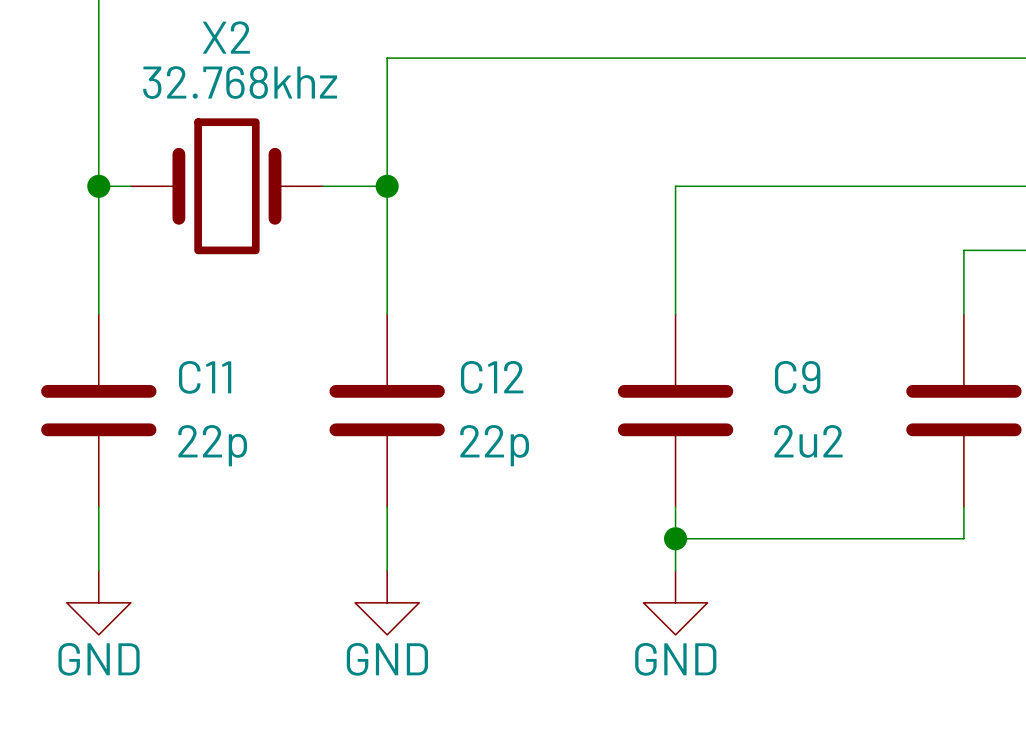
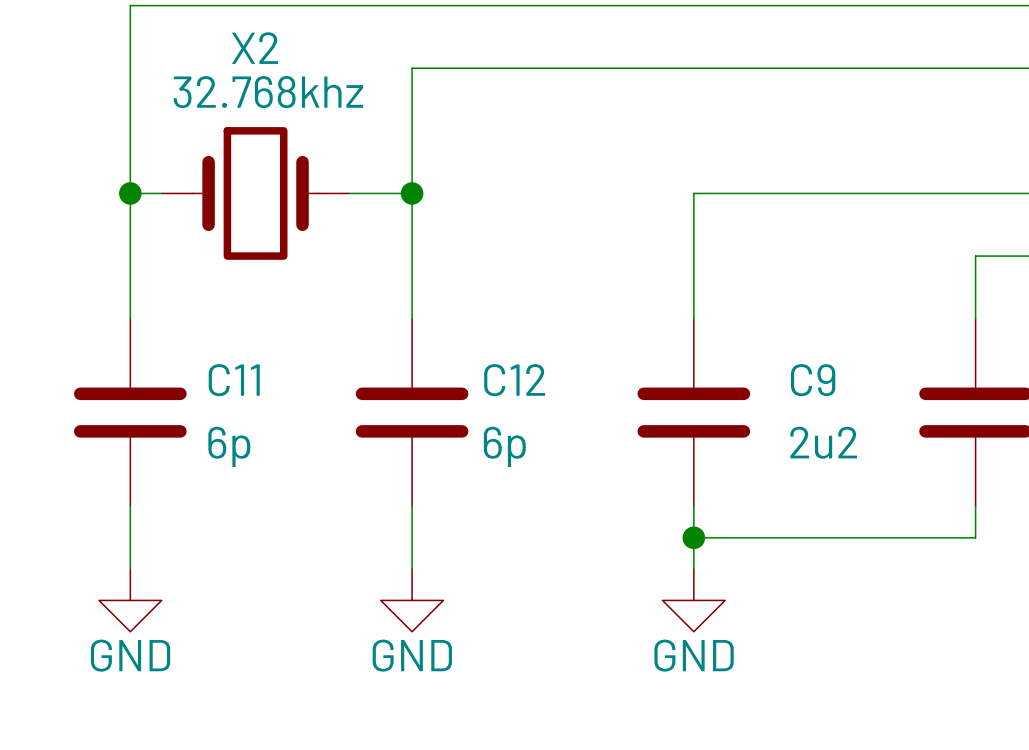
C11 value: 22p (212, 445) -> 6p (229, 446)
C12 value: 22p (494, 445) -> 6p (504, 446)

